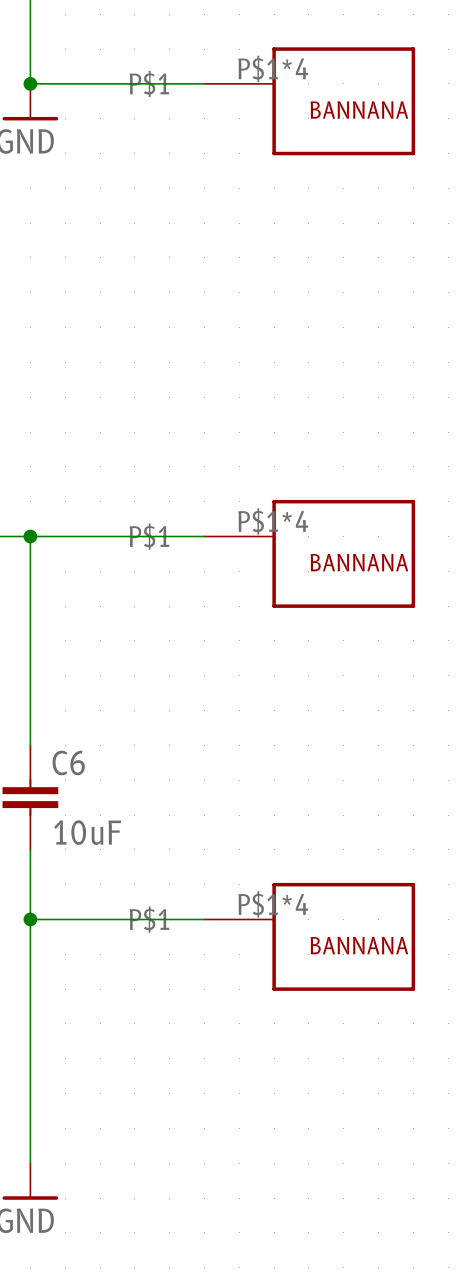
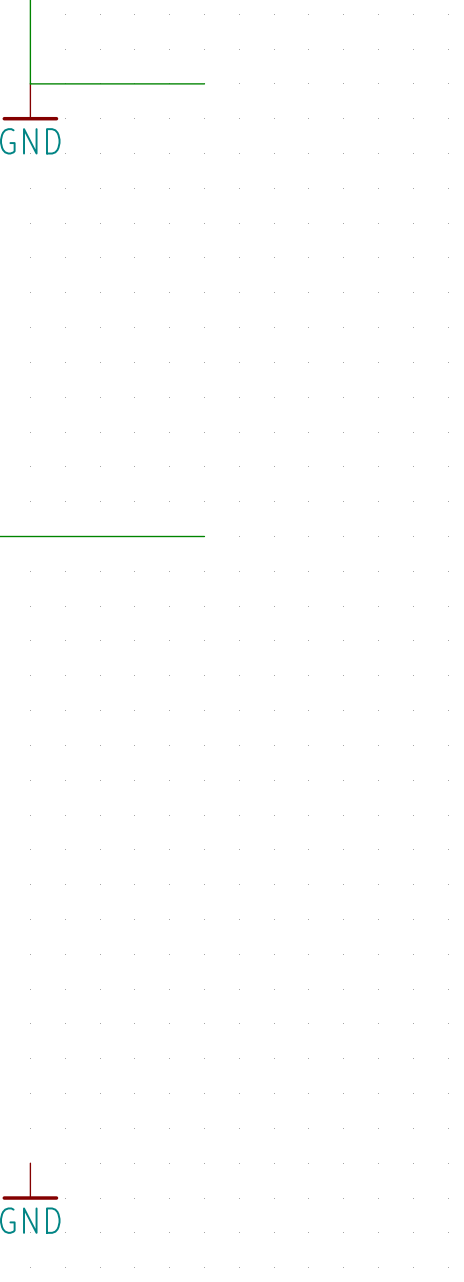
junction: (30, 83) -> none
part: BANNANA (309, 101) -> none
wire: (30, 536) (30, 745) -> none
junction: (30, 536) -> none
part: BANNANA (309, 553) -> none
C6: 10uF (30, 797) -> none
wire: (30, 849) (30, 1163) -> none
wire: (30, 919) (204, 919) -> none
junction: (30, 919) -> none
part: BANNANA (309, 936) -> none

